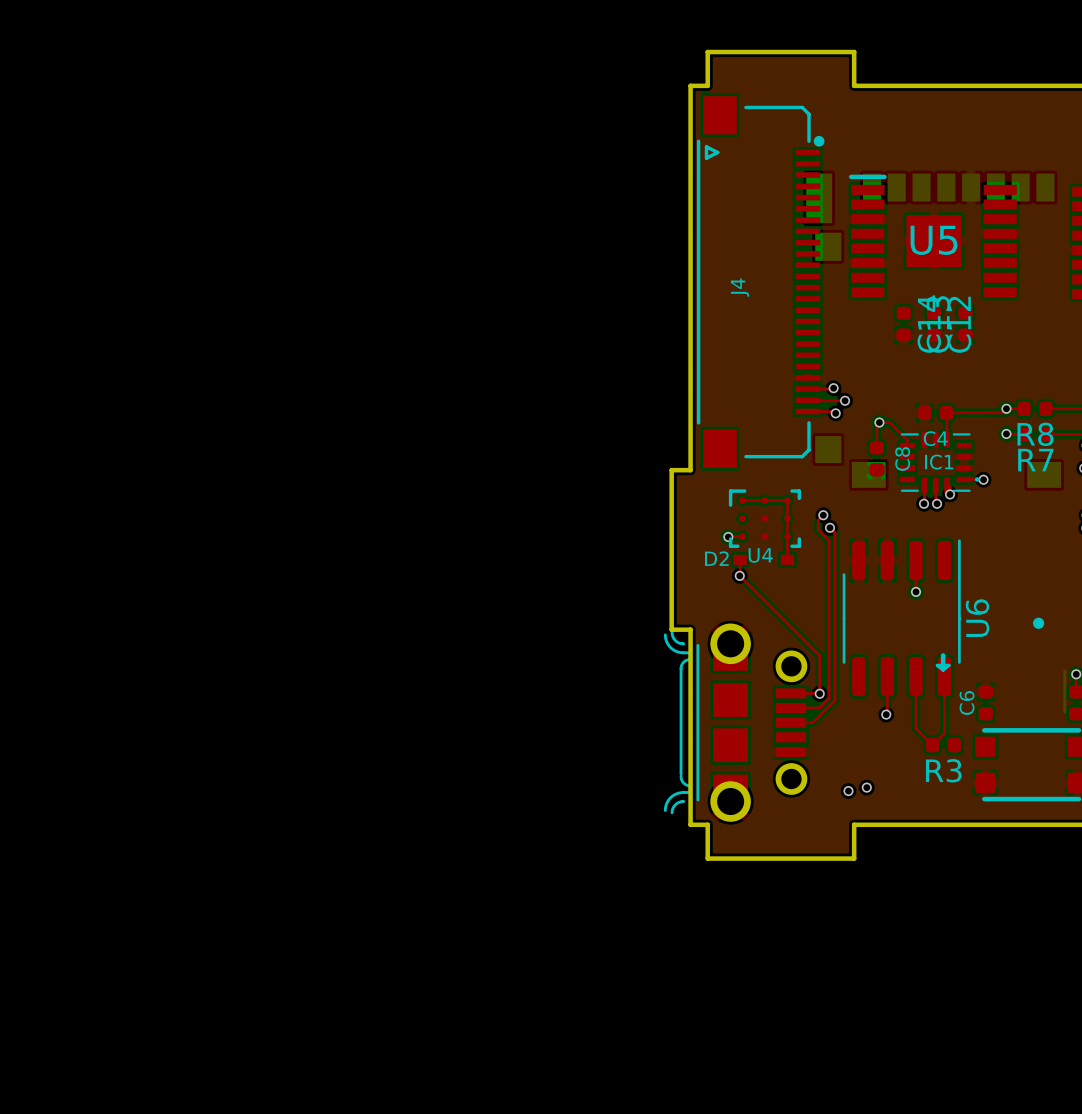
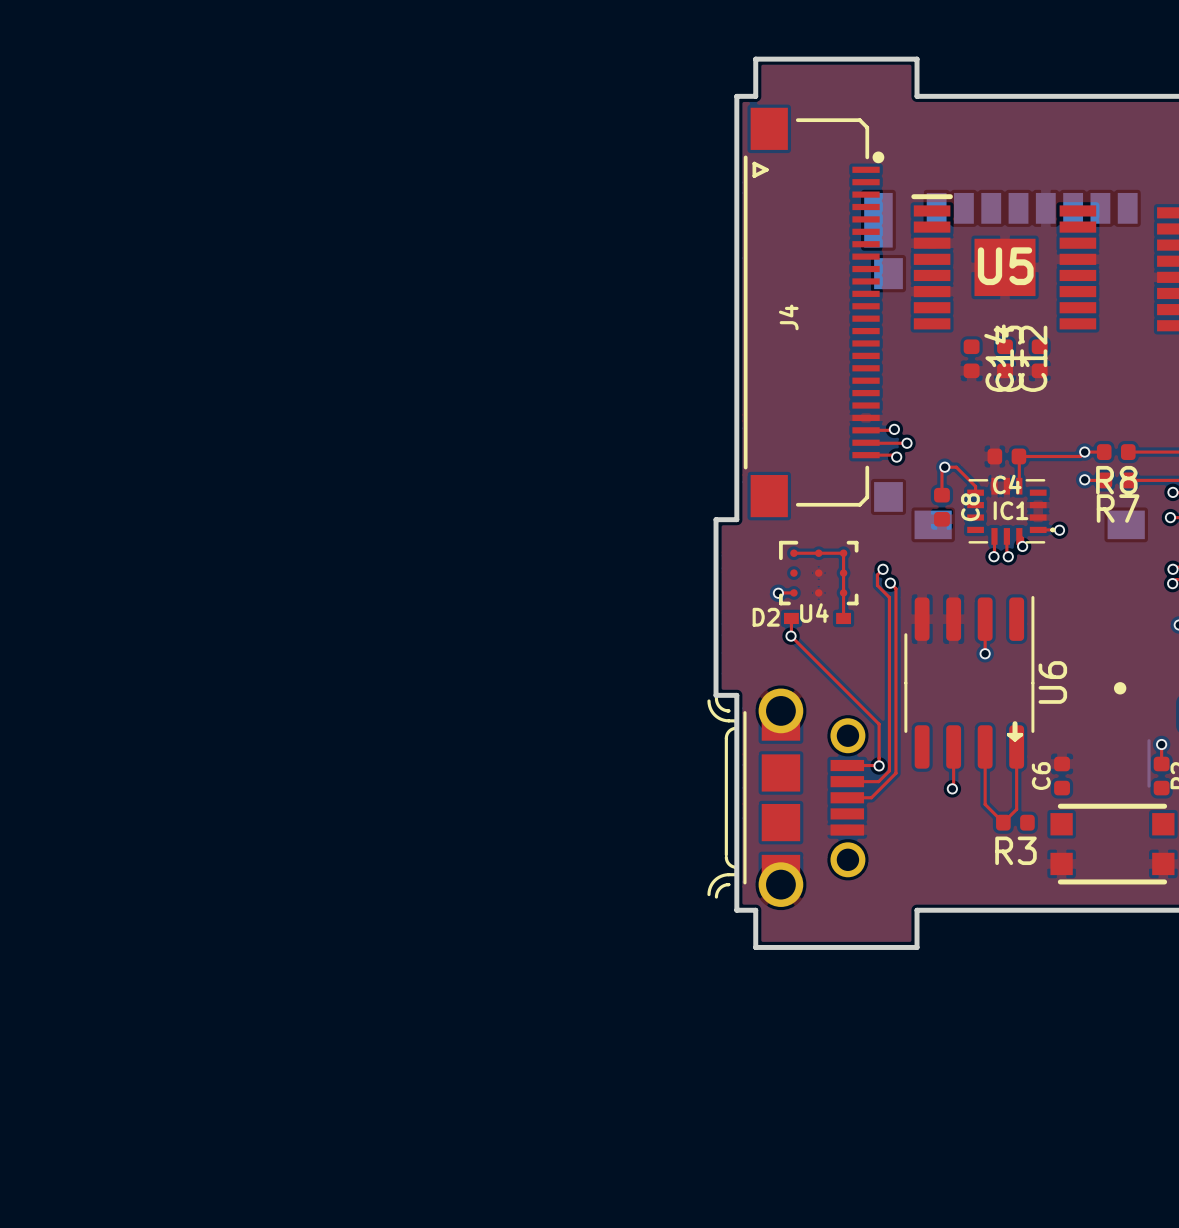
via: (866, 787) -> none
via: (848, 791) -> none

